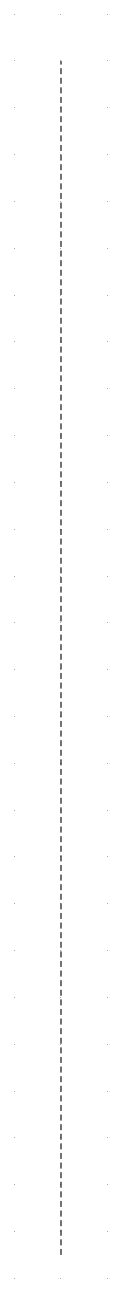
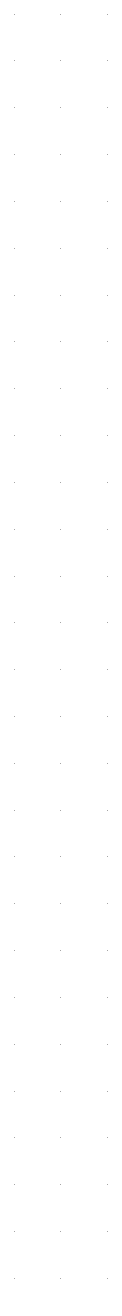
line: (60, 60) (60, 1254) -> none

